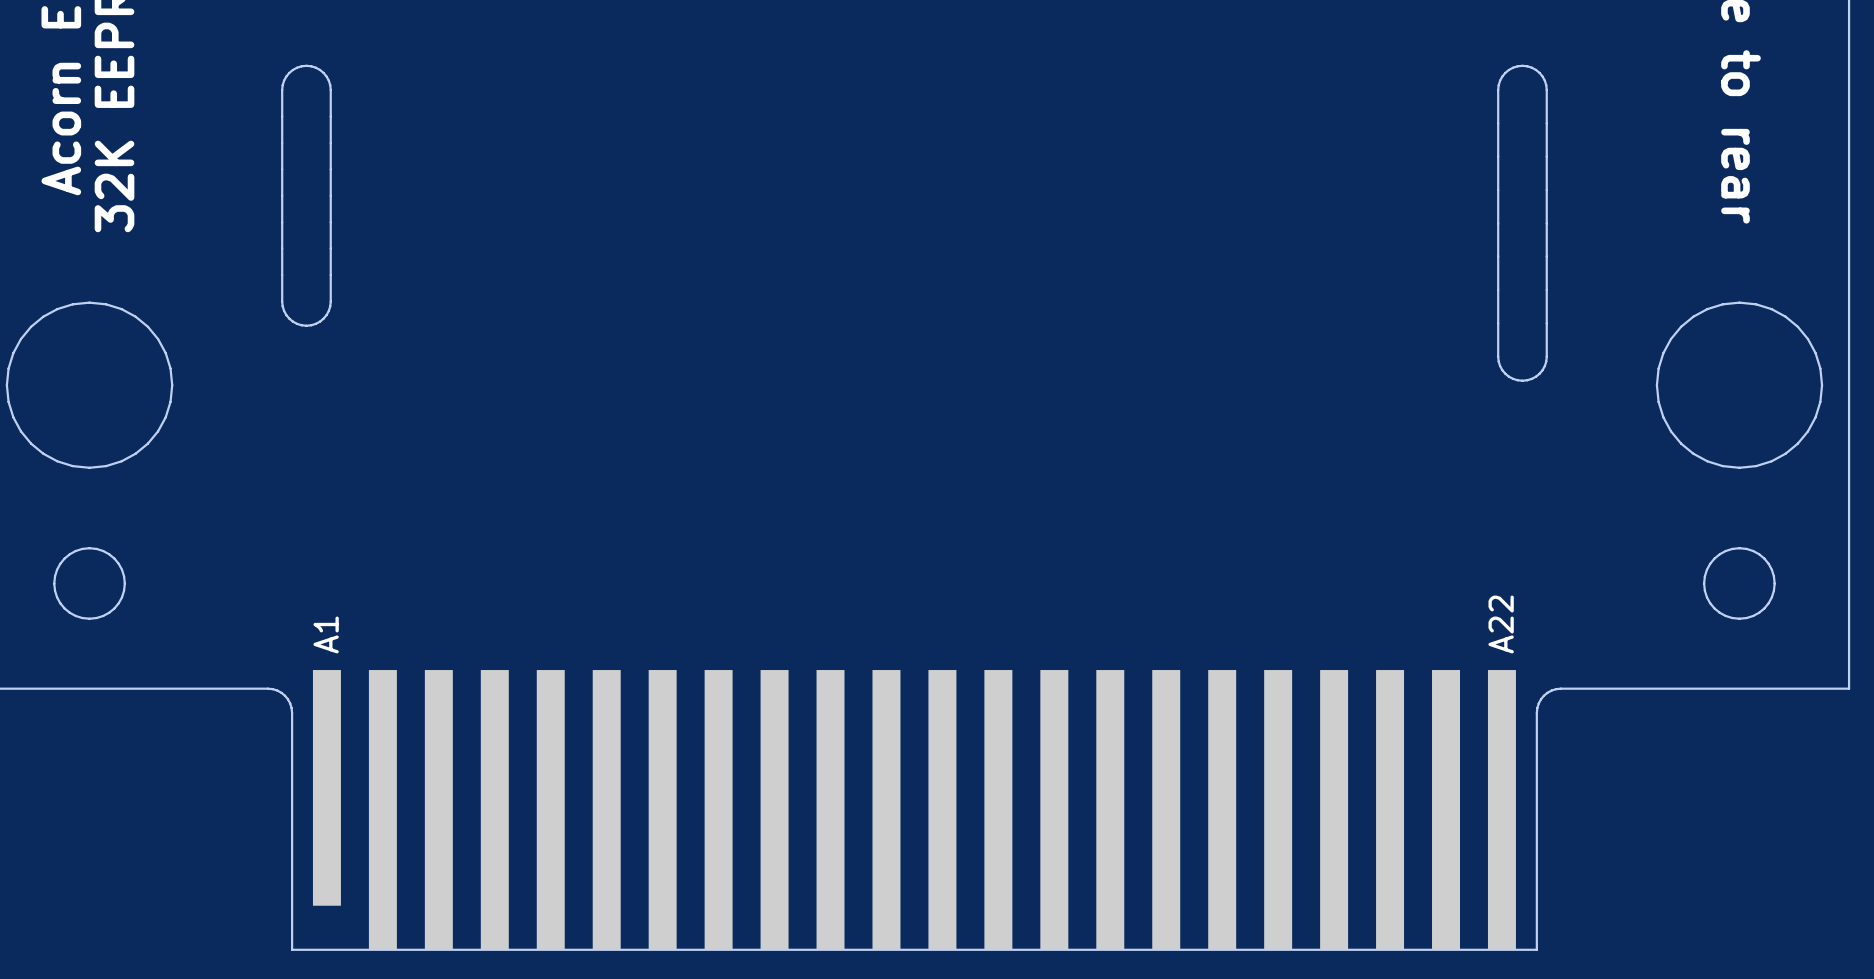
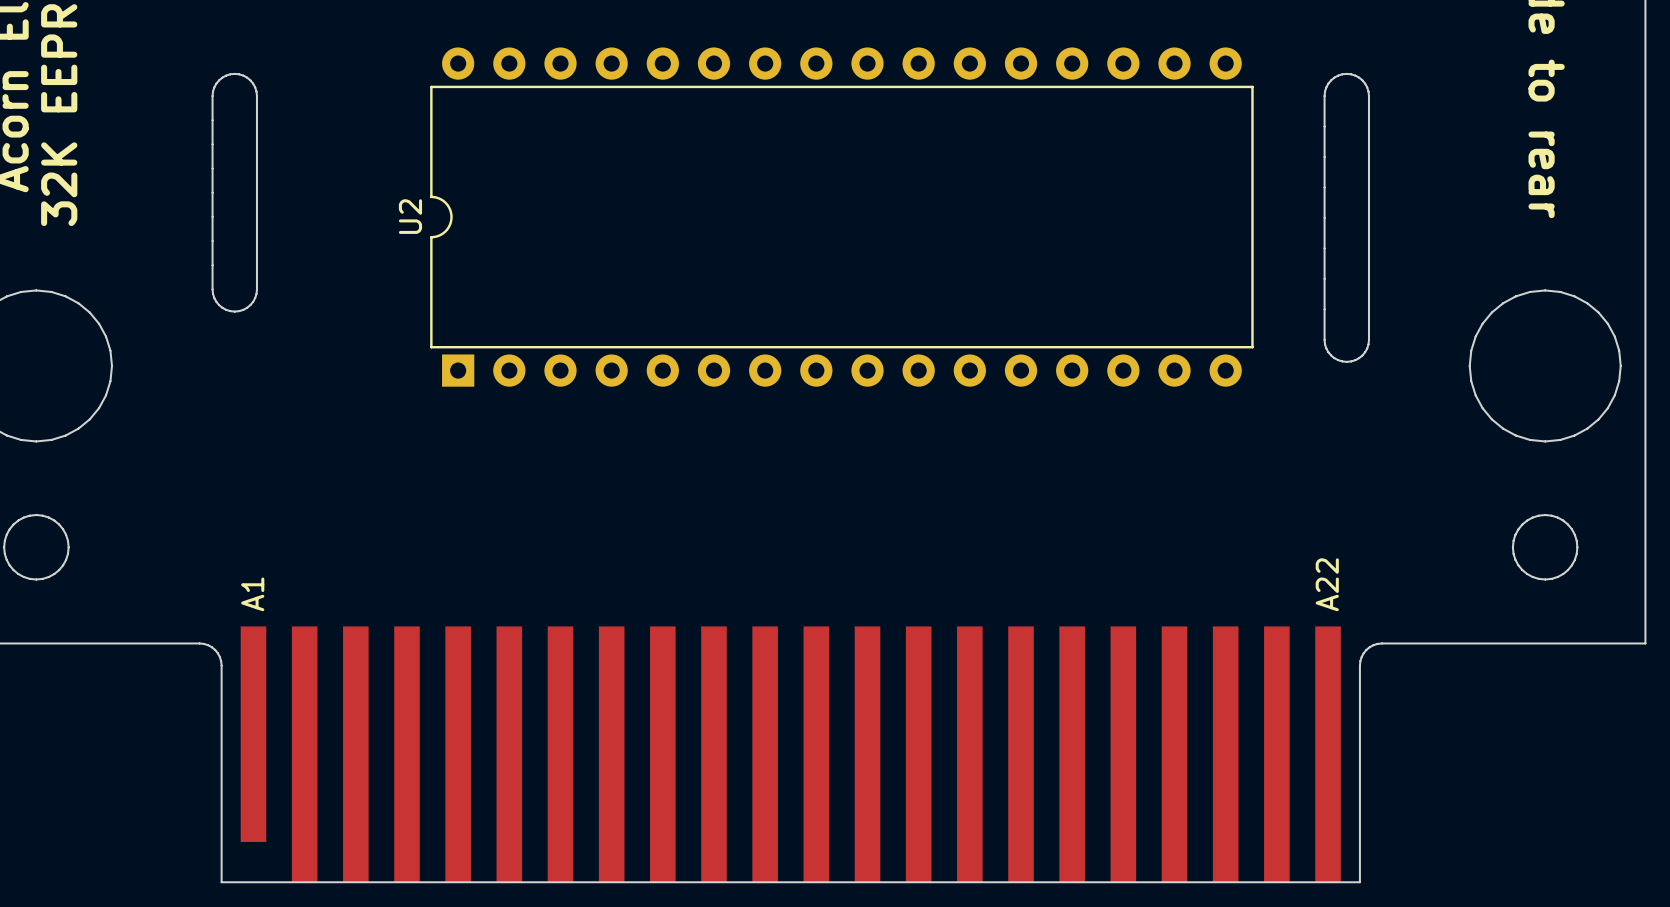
U2: none -> (841, 217)

